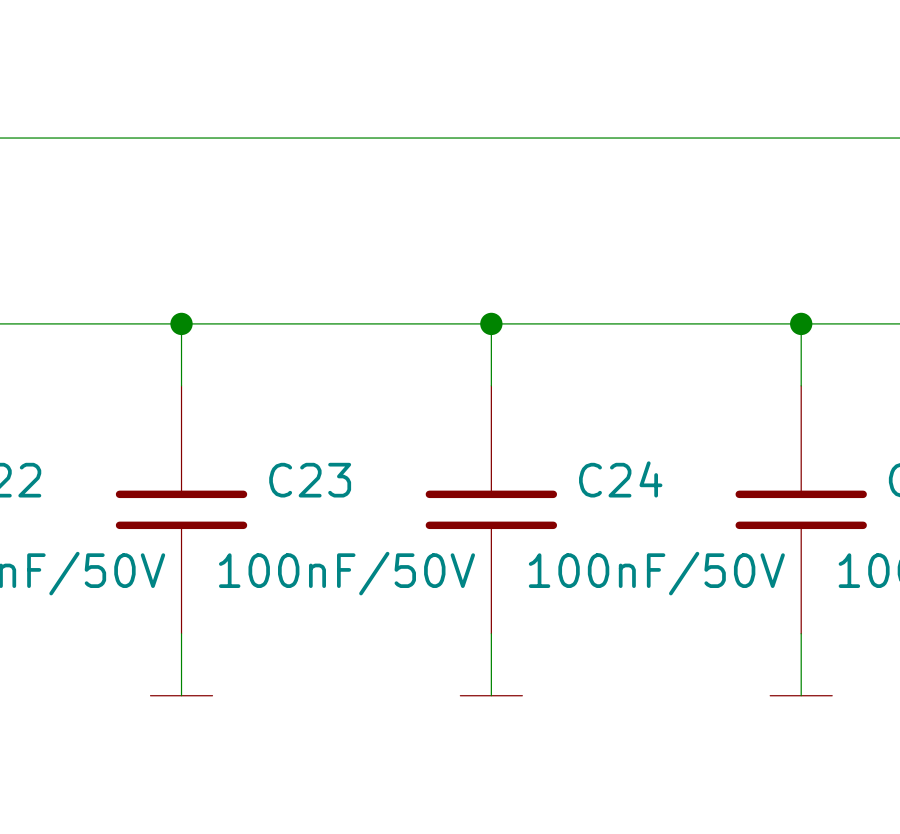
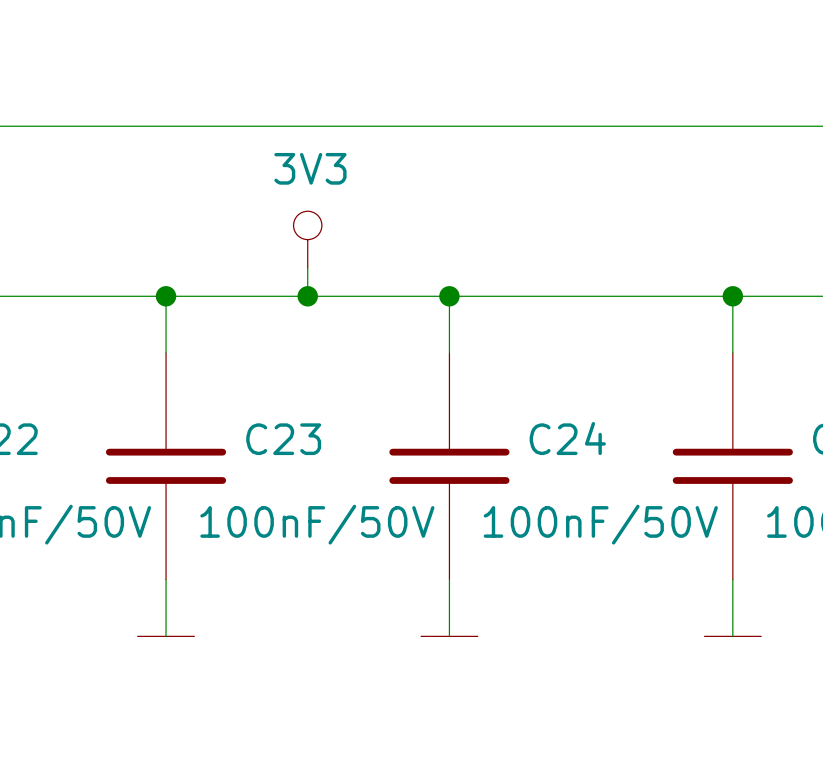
power symbol: none -> 3V3 (307, 239)
wire: none -> (307, 267) (307, 296)
junction: none -> (307, 296)

